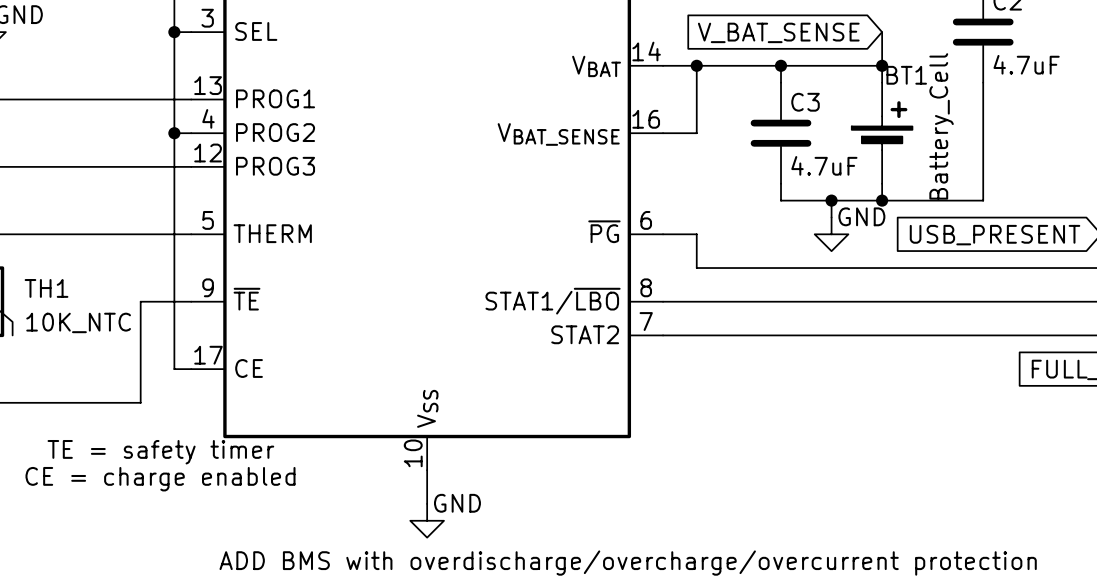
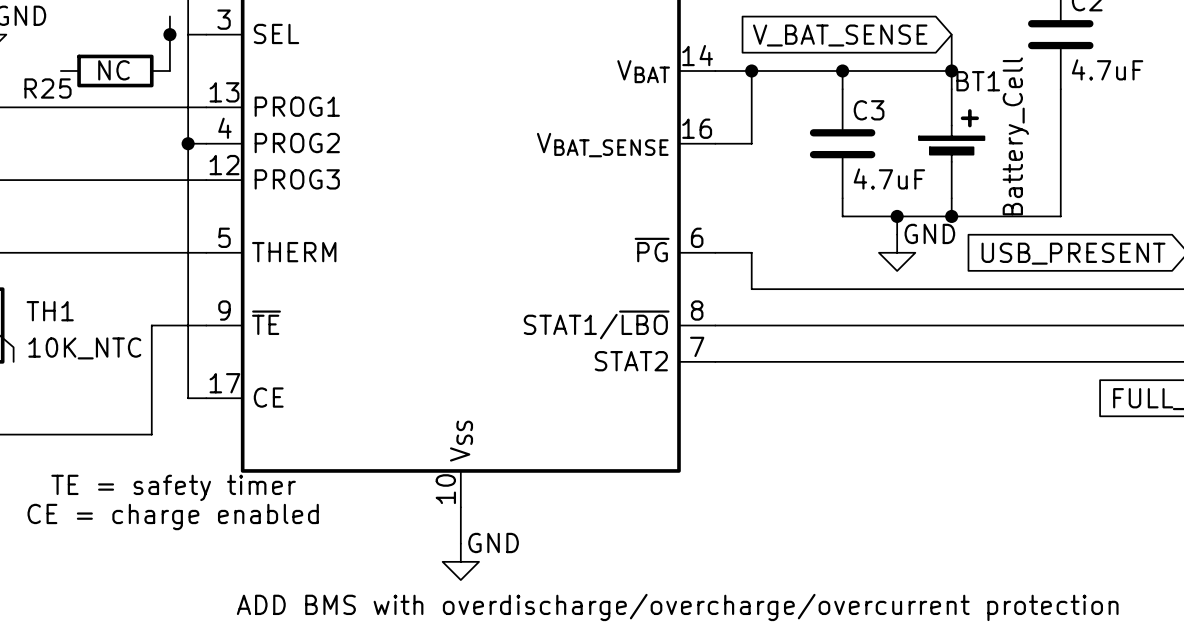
wire: none -> (169, 16) (169, 71)
junction position: (174, 32) -> (169, 34)
R25: none -> NC (115, 71)

